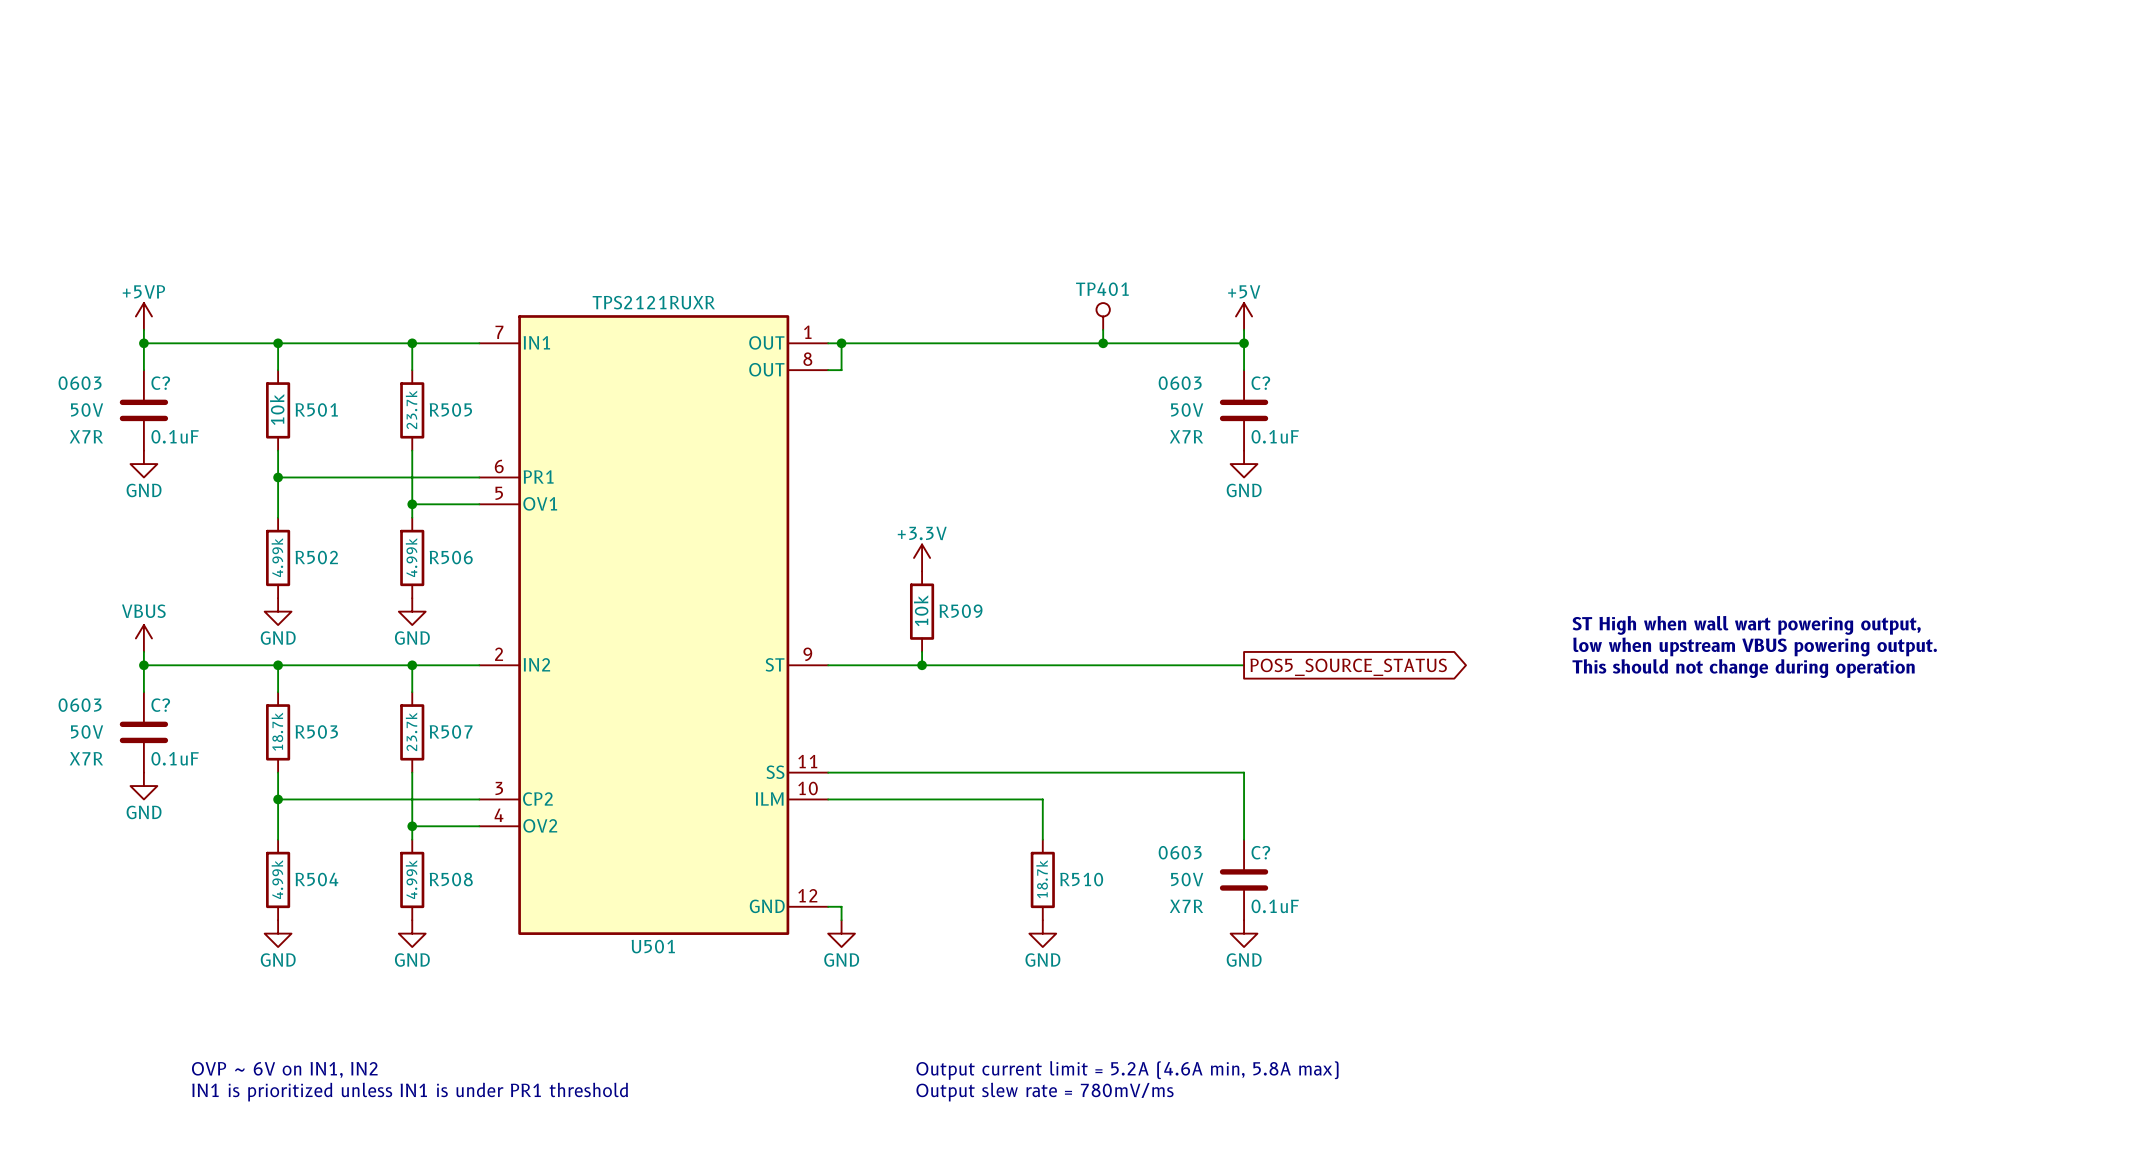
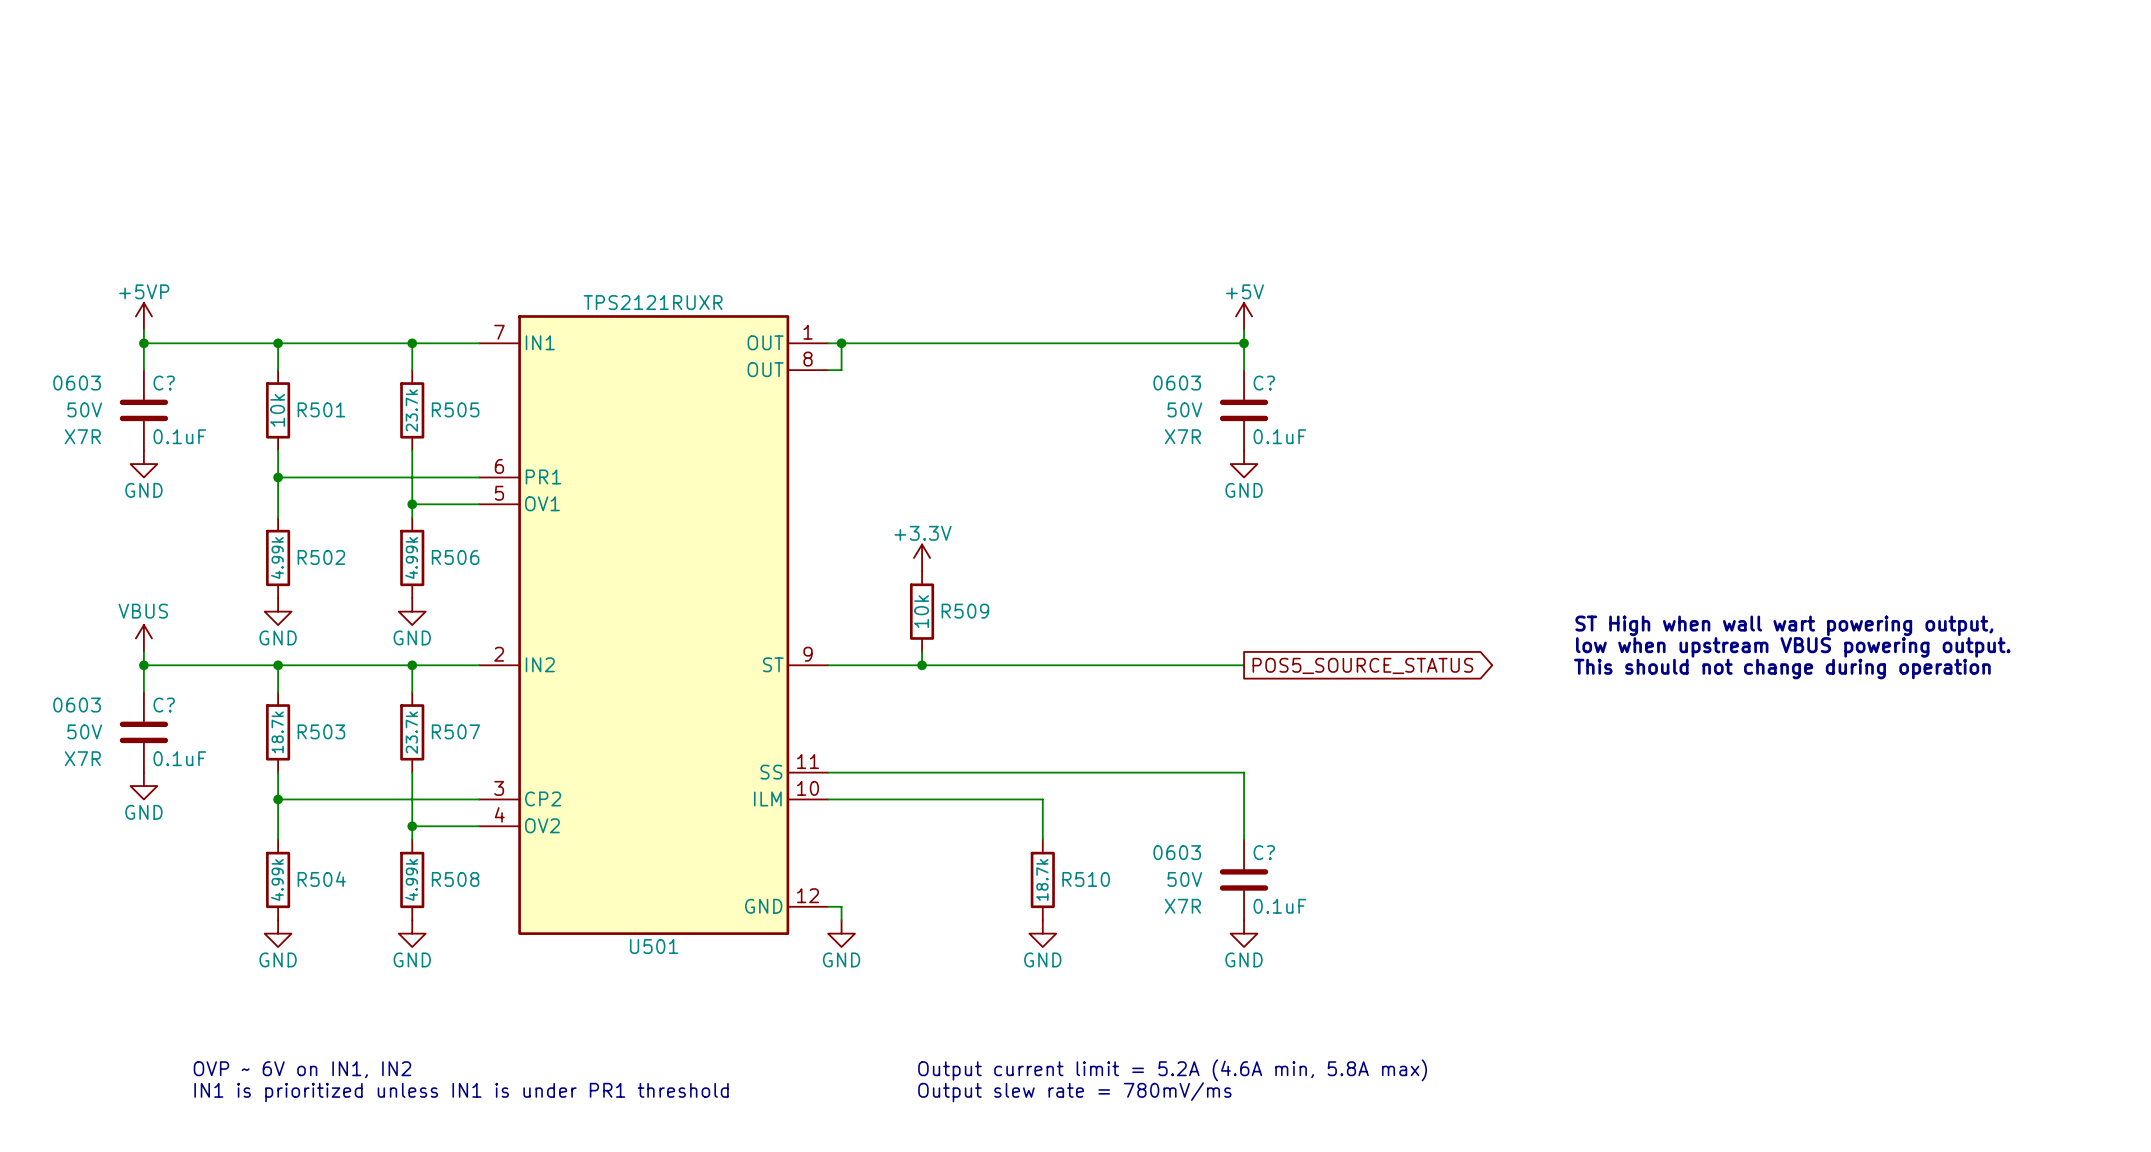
TP401: (1103, 316) -> none
wire: (1103, 329) (1103, 343) -> none
junction: (1103, 343) -> none

